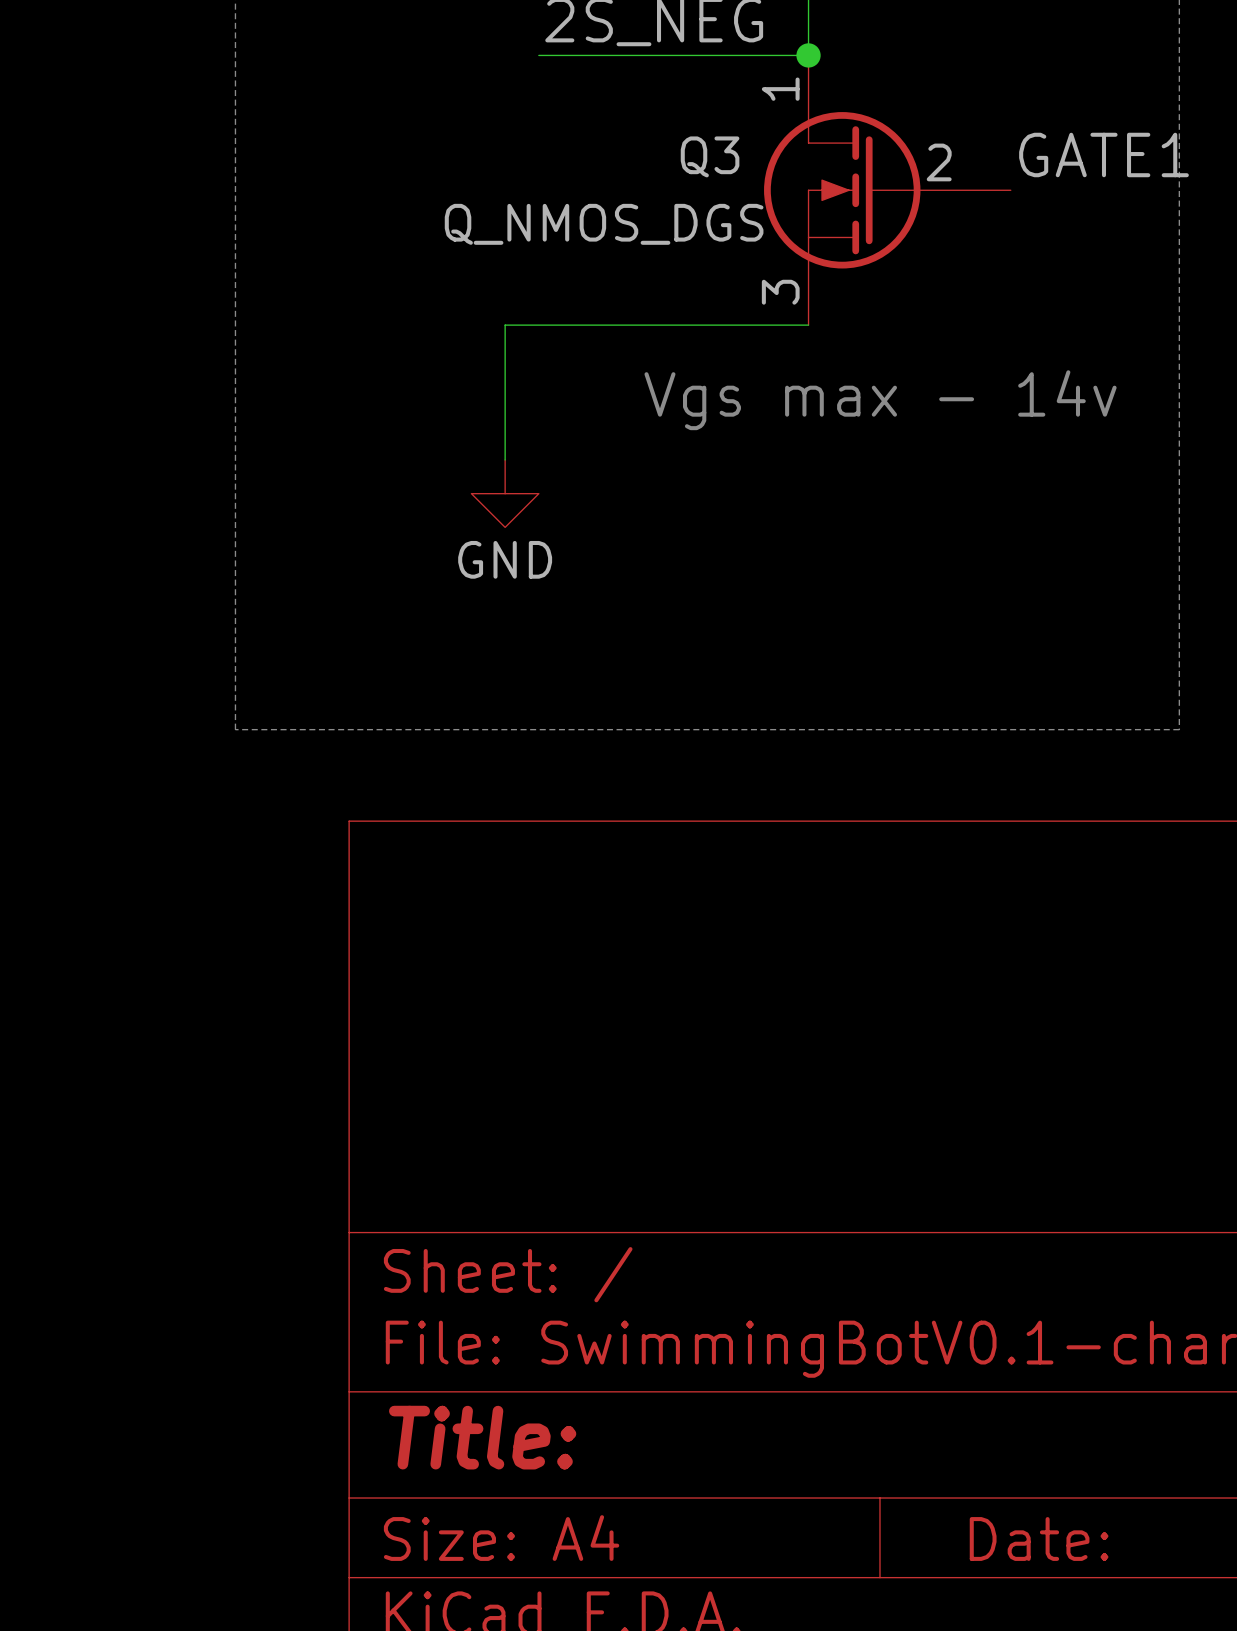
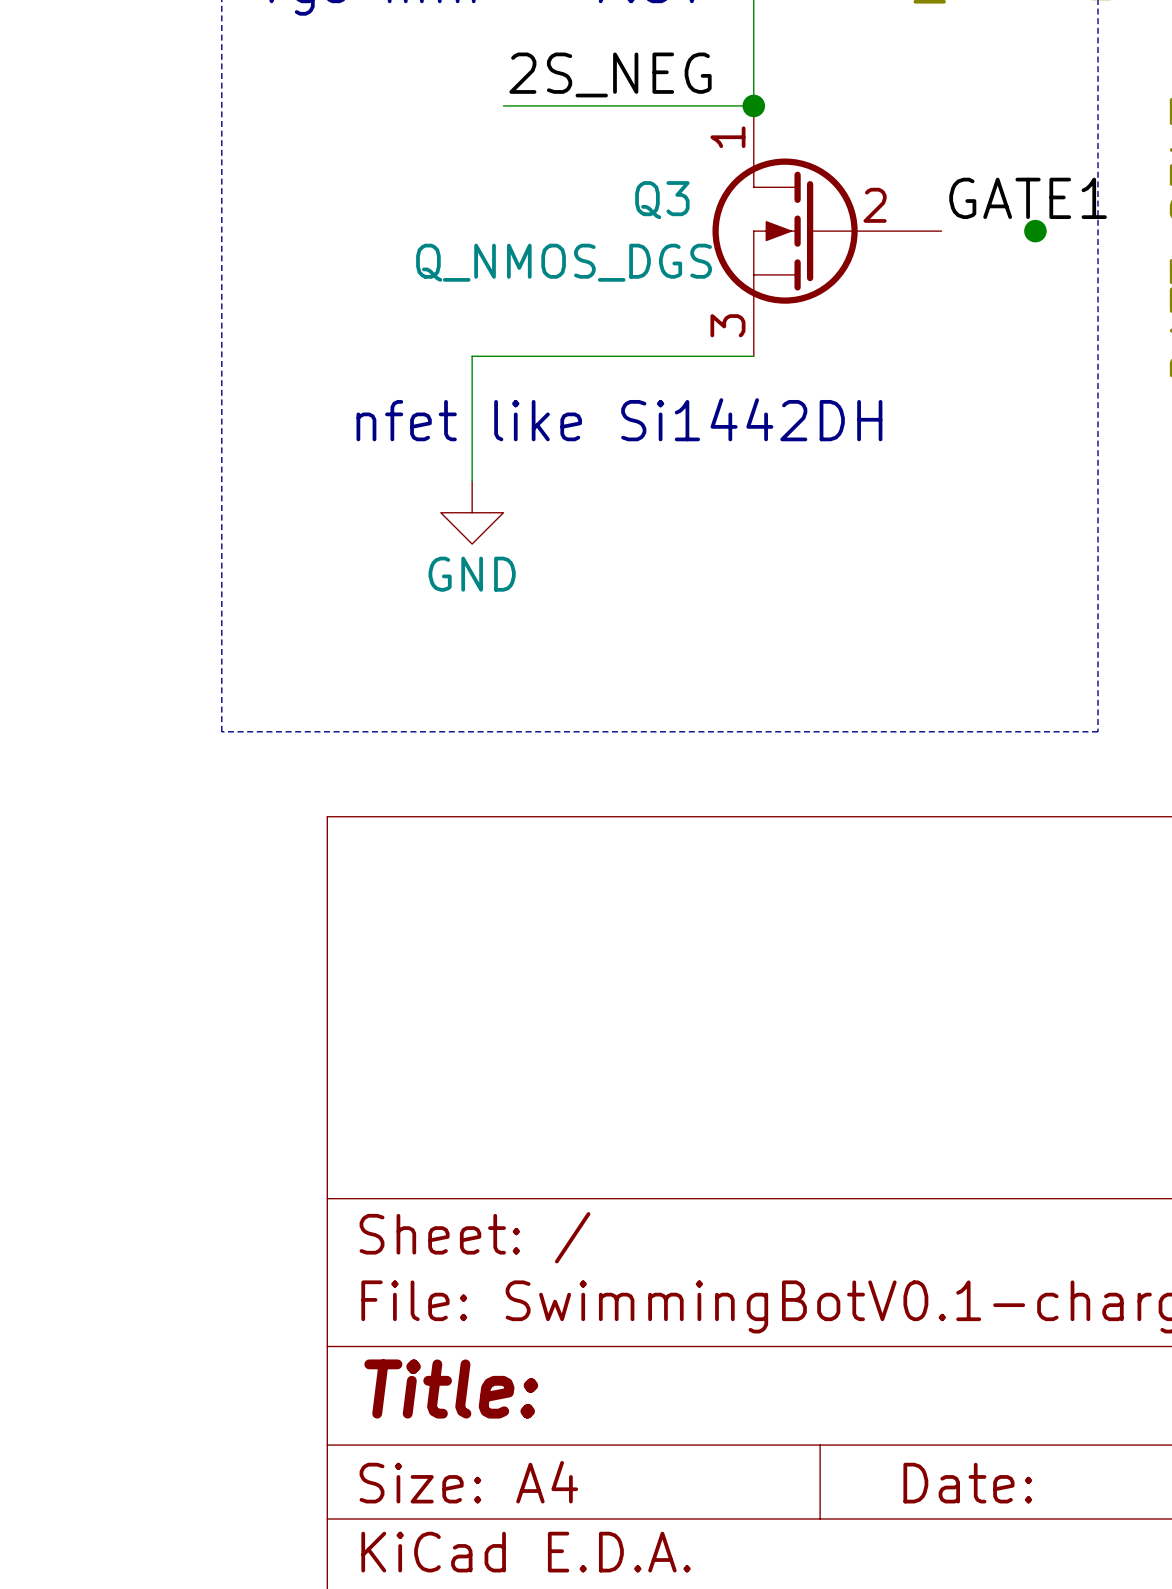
junction: none -> (1035, 231)
text: none -> nfet like Si1442DH (619, 419)
text: Vgs max - 14v (880, 400) -> none

